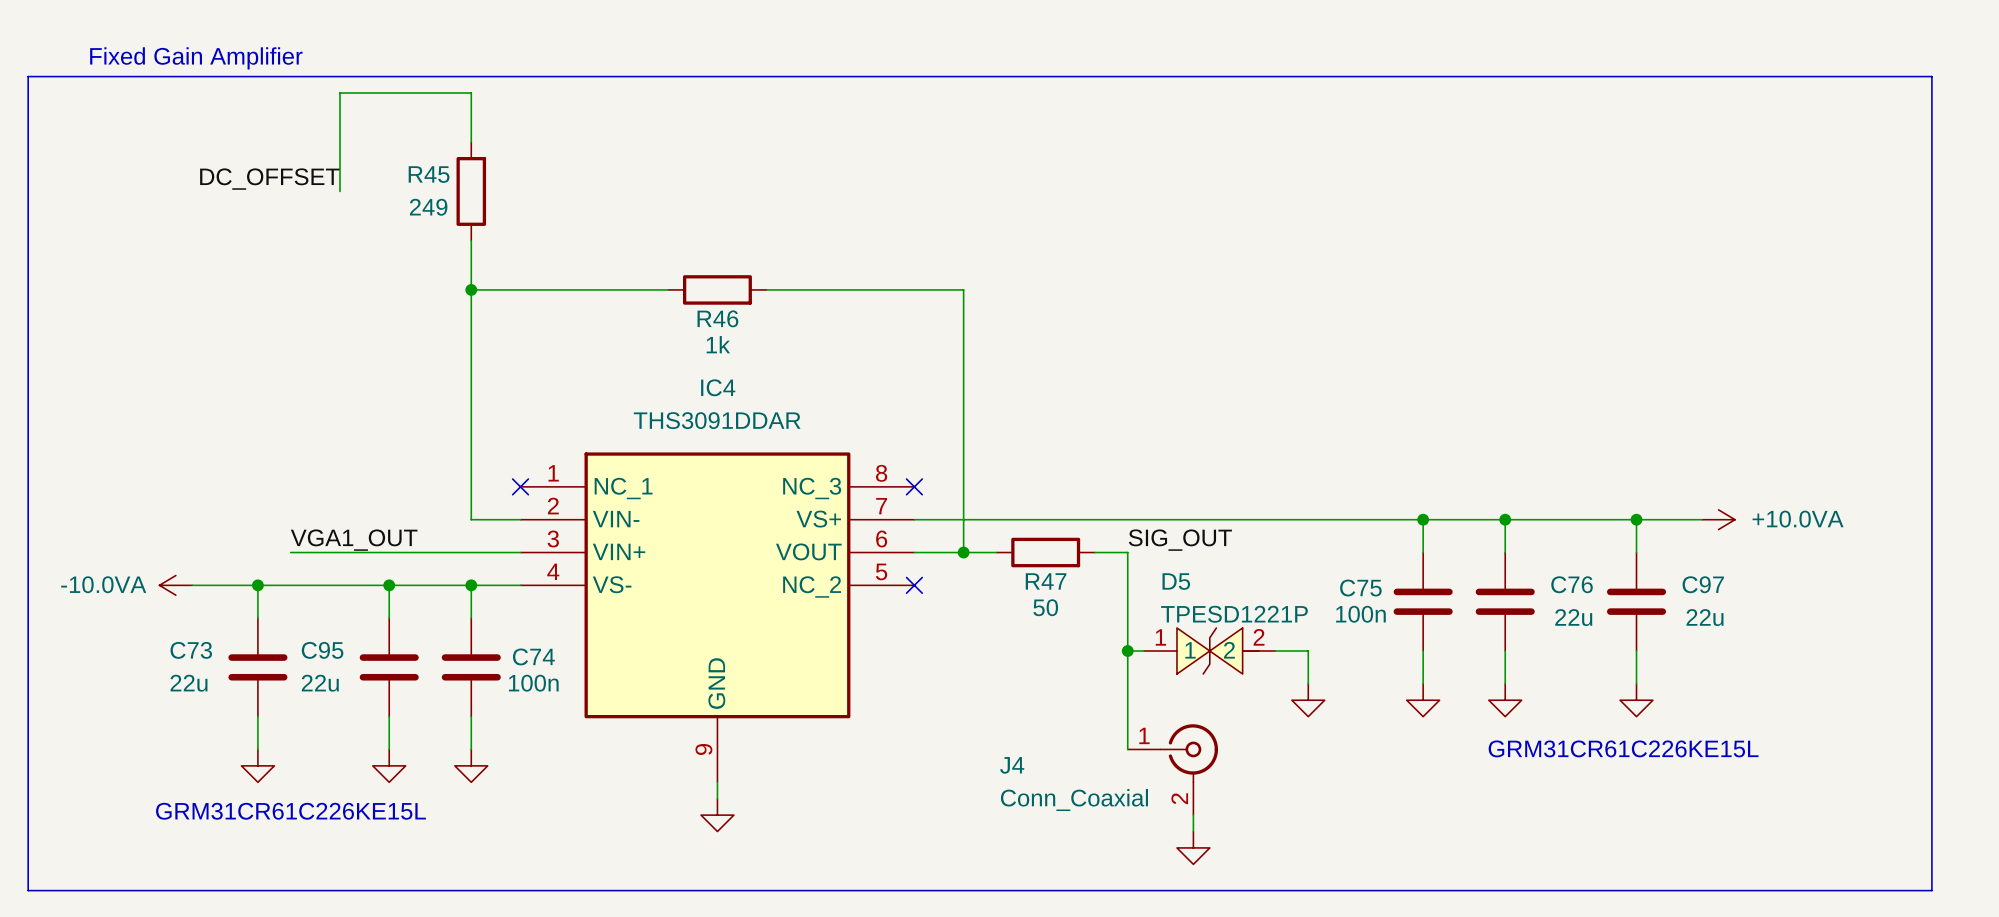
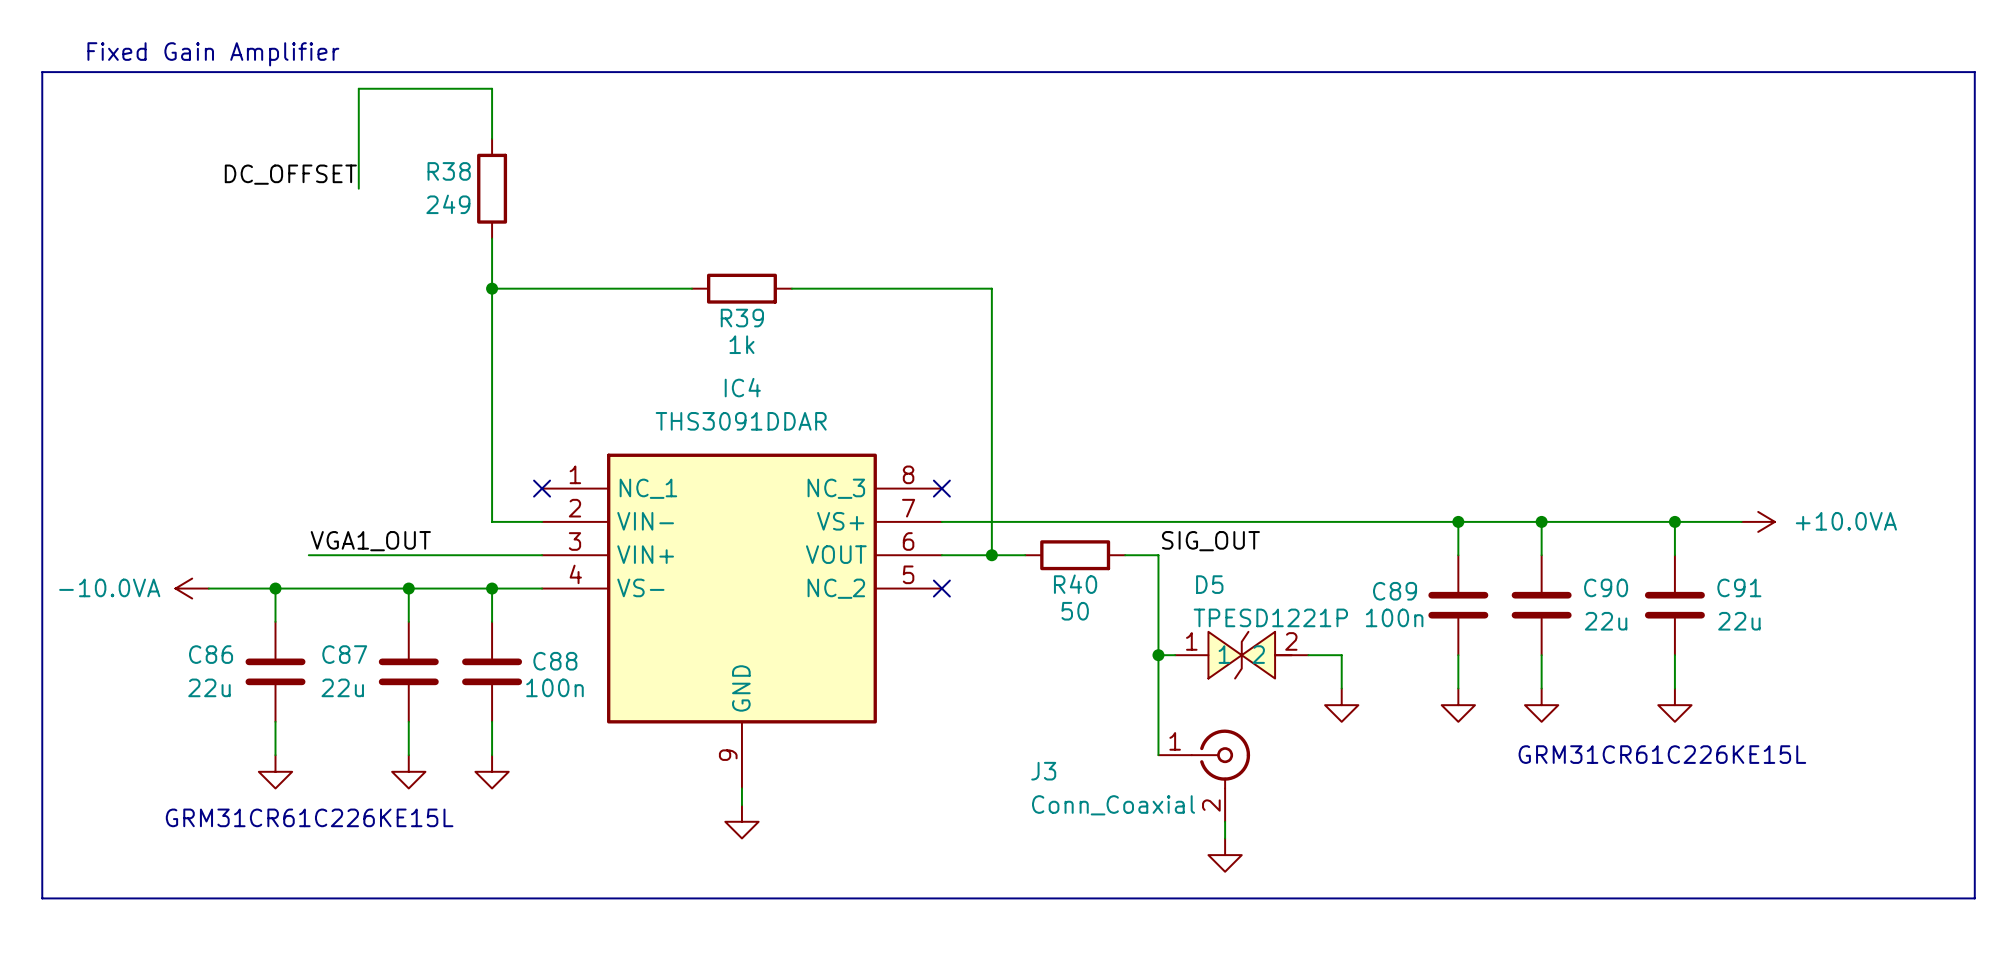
R45 name: R45 (429, 174) -> R38 (449, 171)
R46 name: R46 (717, 318) -> R39 (742, 318)
R47 name: R47 (1046, 581) -> R40 (1075, 584)
C76 name: C76 (1572, 584) -> C90 (1606, 587)
C97 name: C97 (1703, 584) -> C91 (1739, 587)
C75 name: C75 (1360, 588) -> C89 (1395, 591)
C73 name: C73 (191, 650) -> C86 (211, 654)
C95 name: C95 (322, 650) -> C87 (344, 654)
C74 name: C74 (533, 656) -> C88 (555, 661)
J4 name: J4 (1012, 765) -> J3 (1043, 771)

